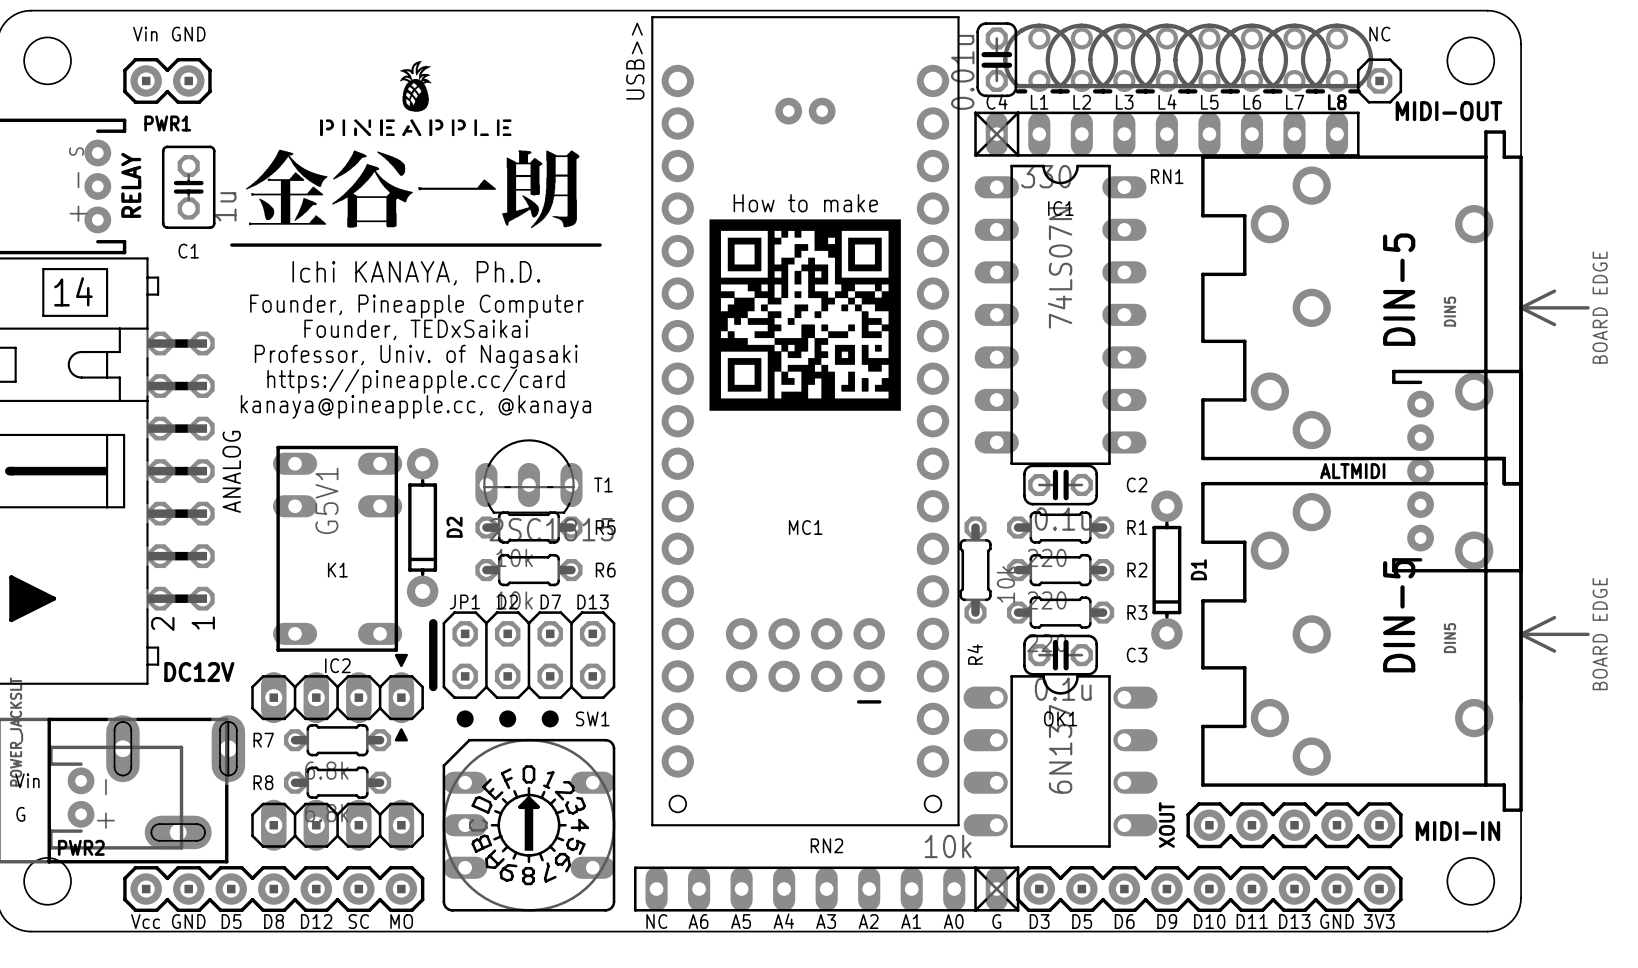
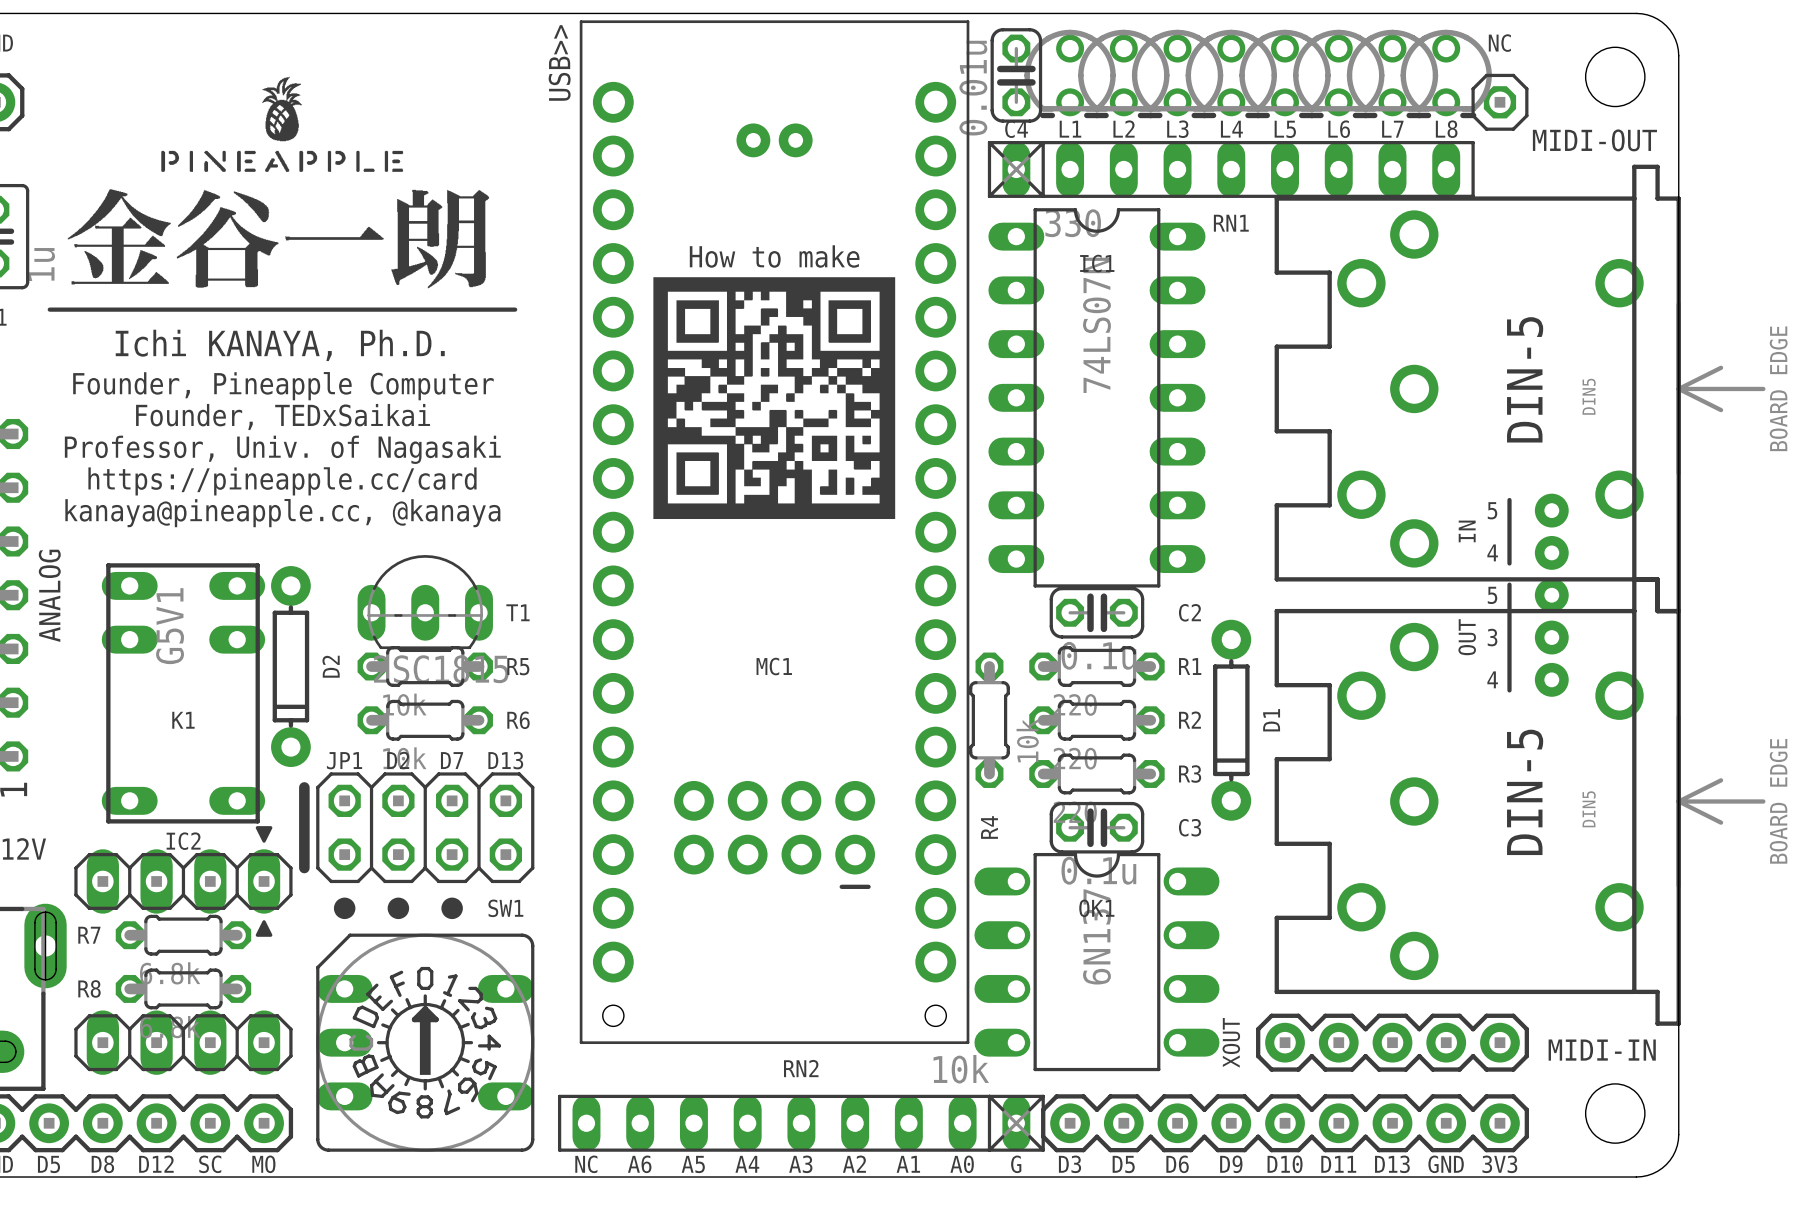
line: none -> (1509, 500) (1509, 563)
text: none -> 5 (1492, 510)
text: none -> IN (1467, 531)
text: none -> 4 (1492, 552)
line: none -> (1509, 584) (1509, 690)
text: none -> 5 (1492, 595)
ALTMIDI side: top (1457, 471) -> bottom (1551, 595)
text: none -> OUT (1467, 637)
text: none -> 3 (1492, 637)
text: none -> 4 (1492, 679)

